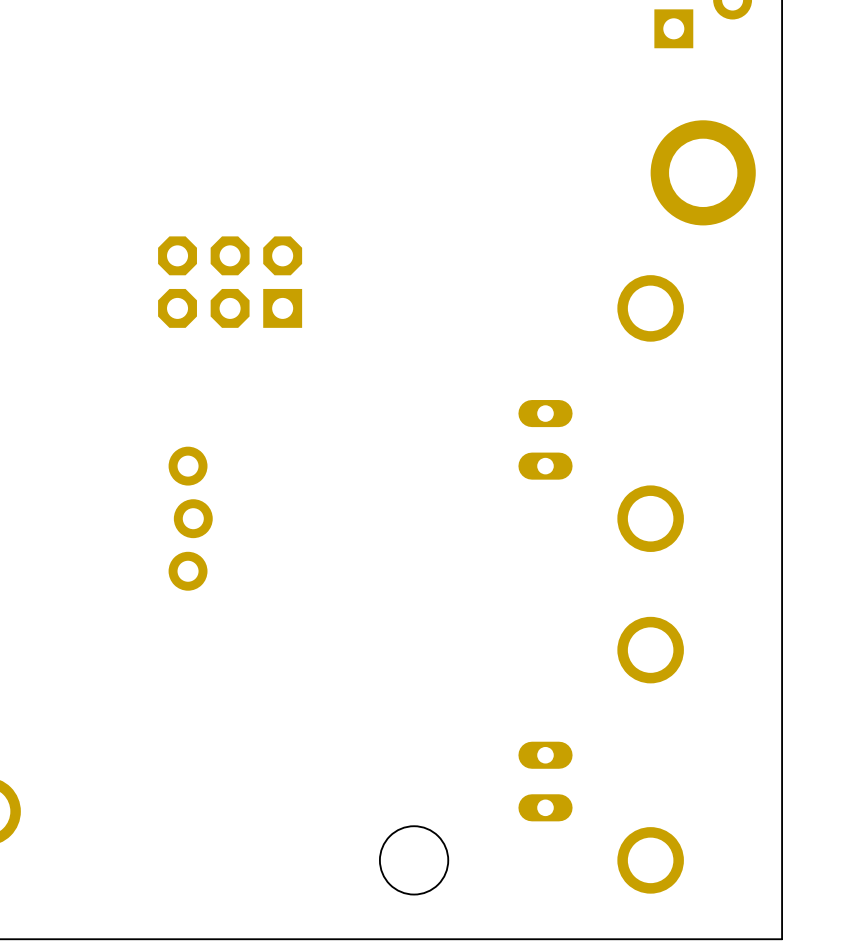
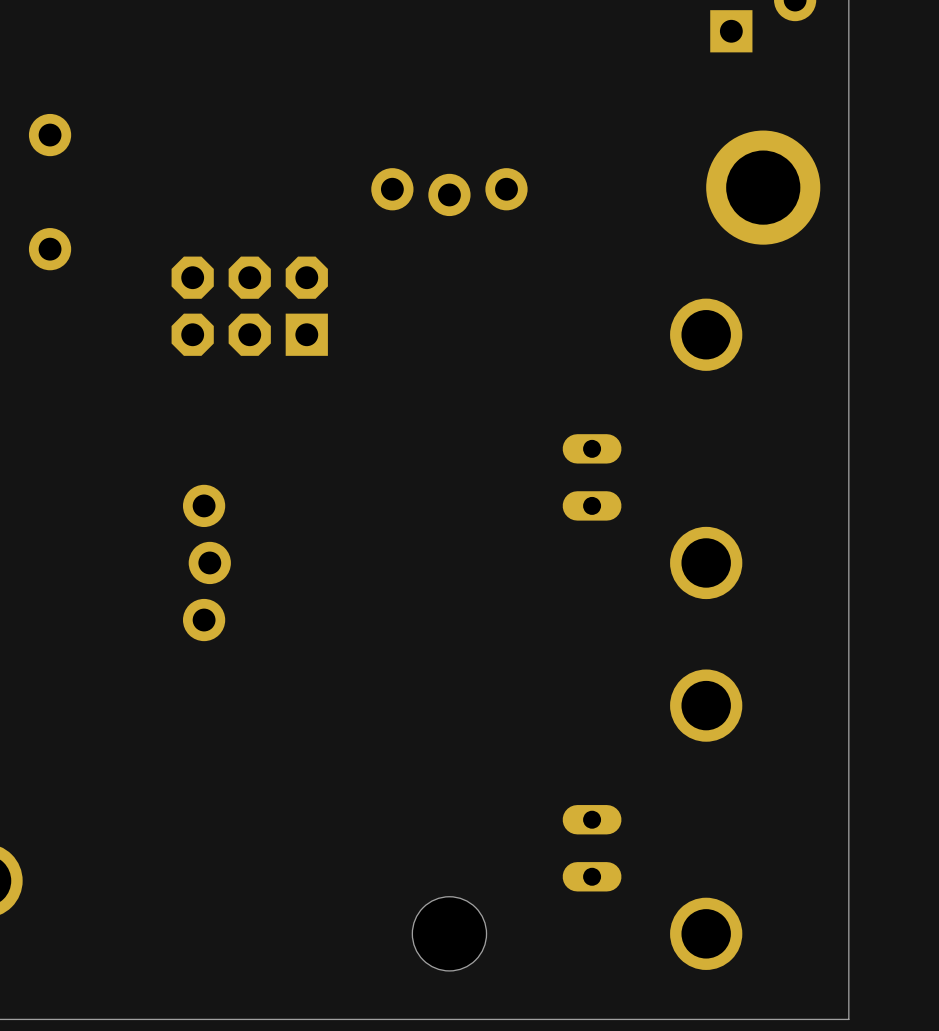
part: none -> (50, 135)
part: none -> (449, 192)
part: none -> (50, 249)

